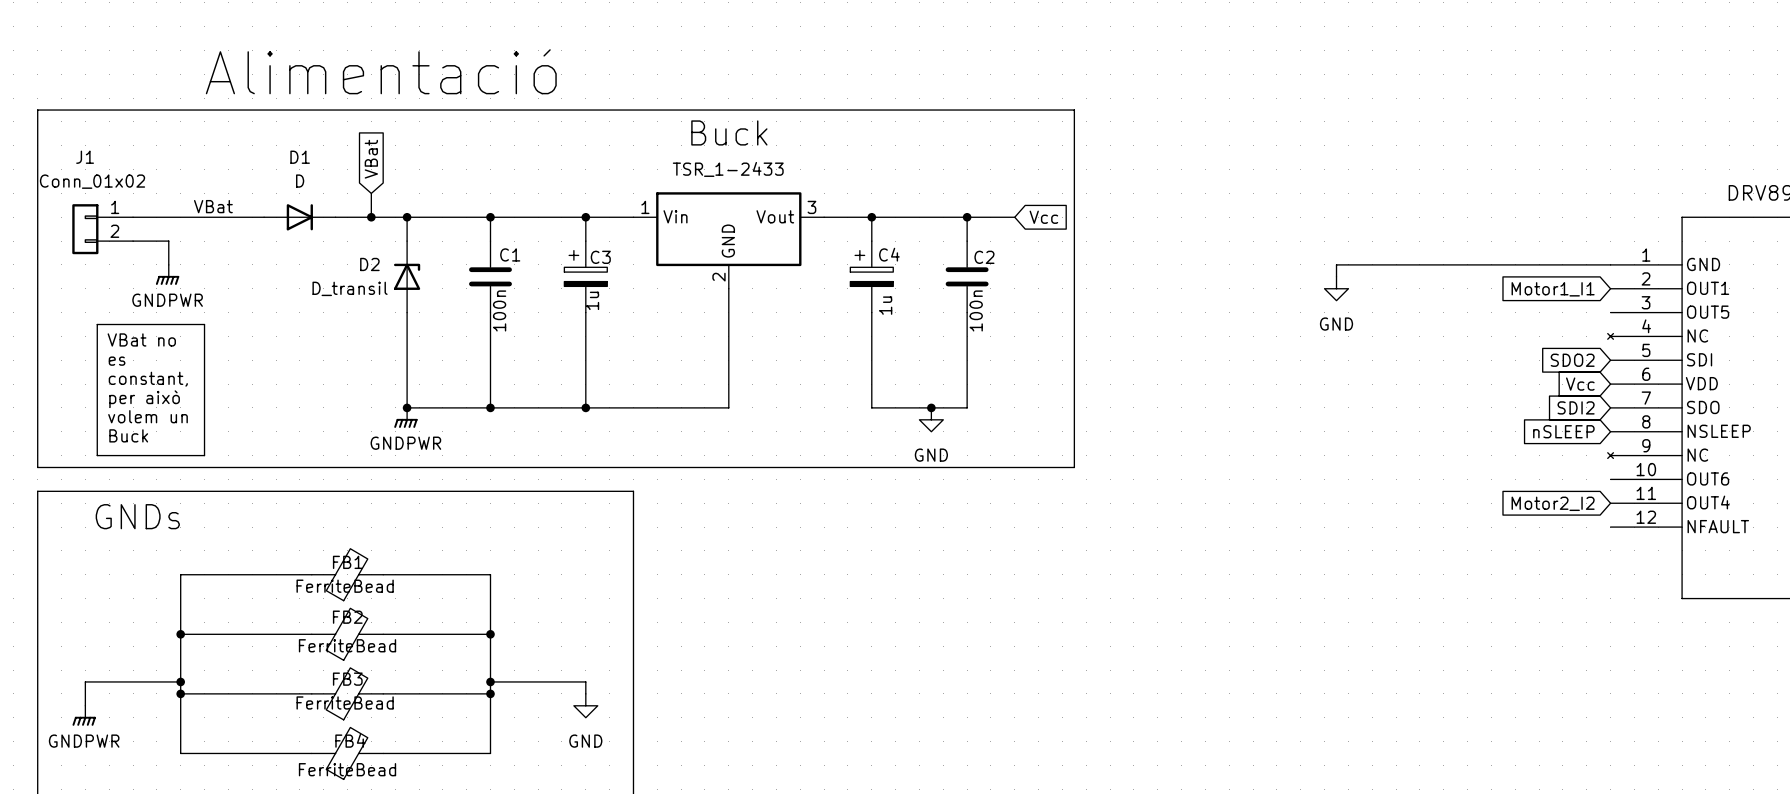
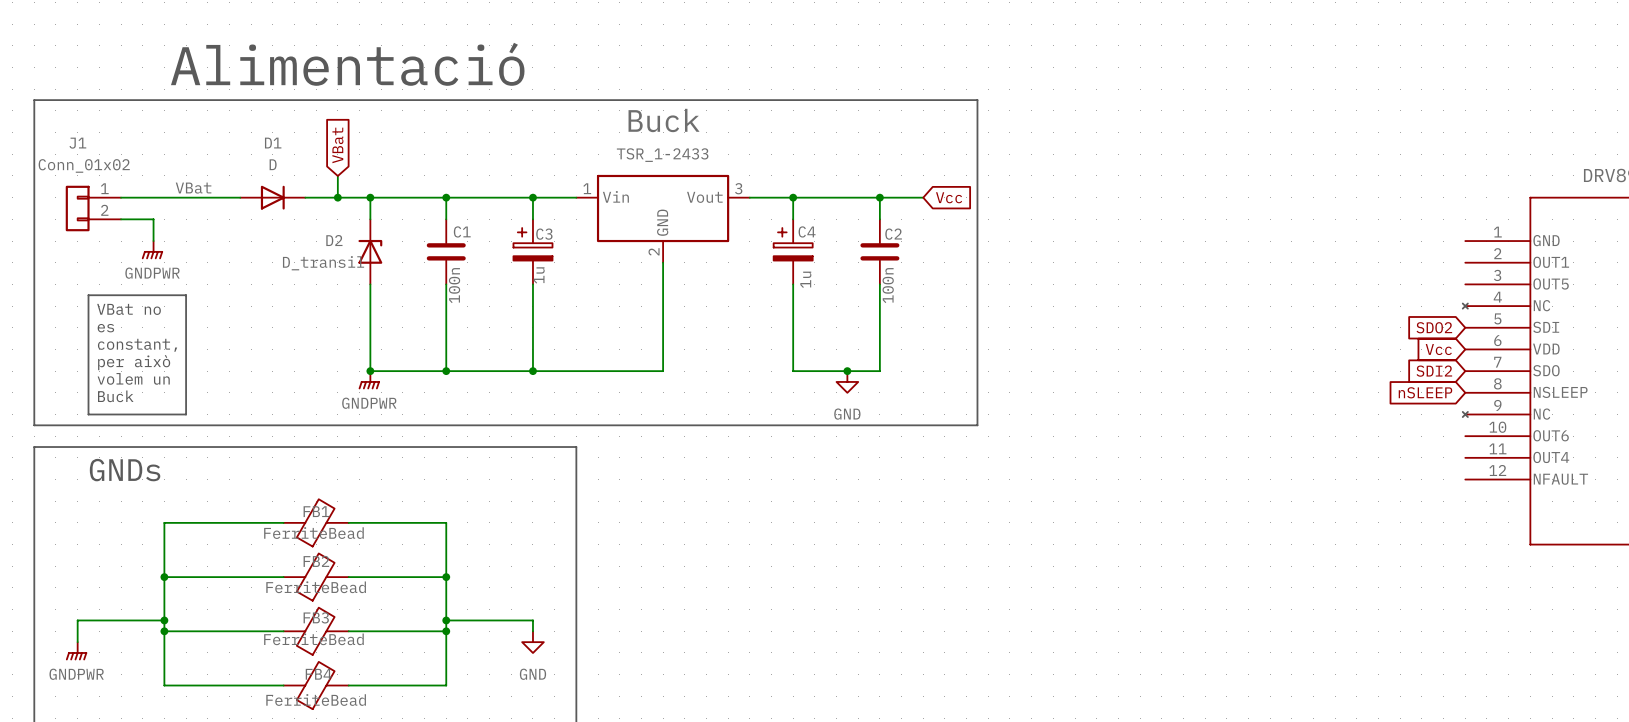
wire: (1610, 264) (1336, 264) (1336, 276) -> none
power symbol: GND (1336, 288) -> none
global label: Motor1_I1 (1553, 289) -> none
global label: Motor2_I2 (1553, 503) -> none

